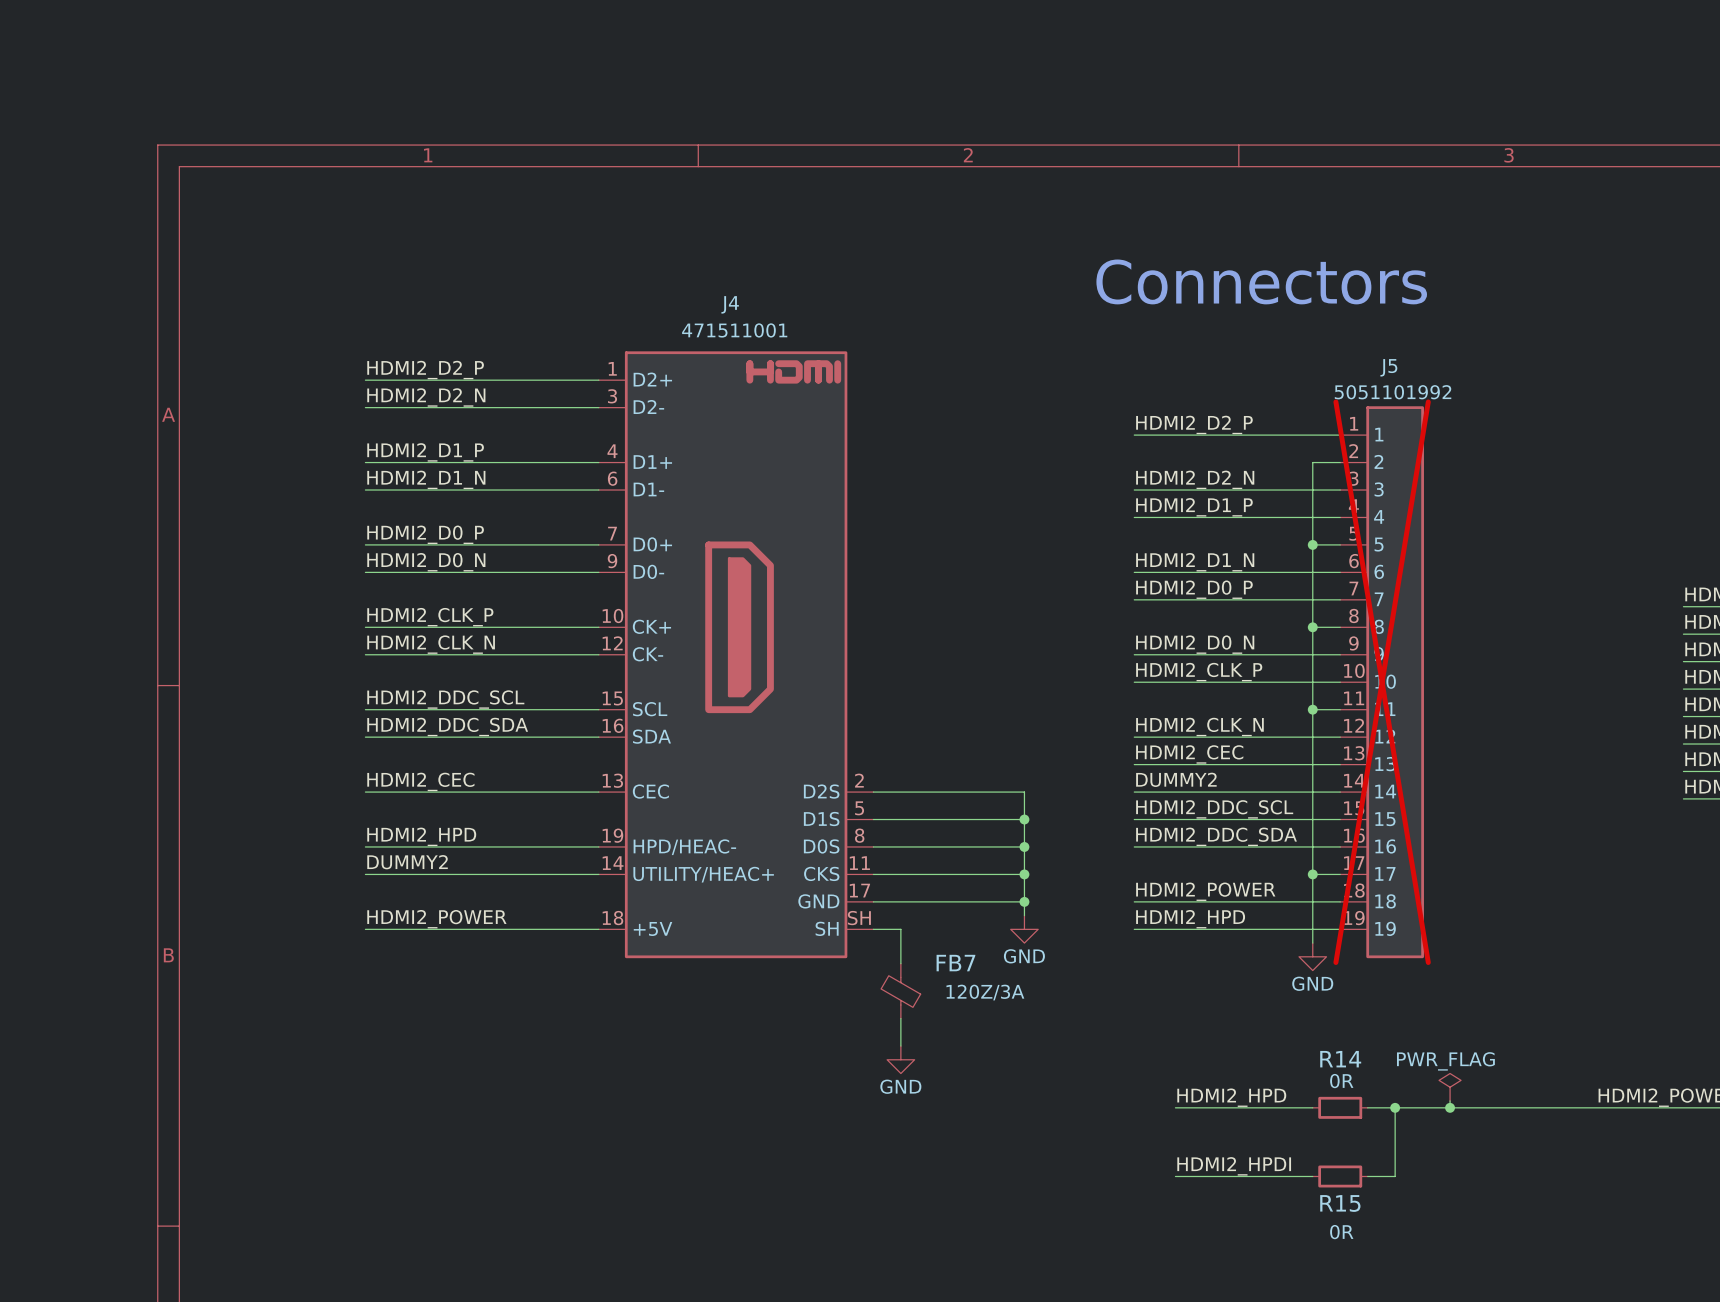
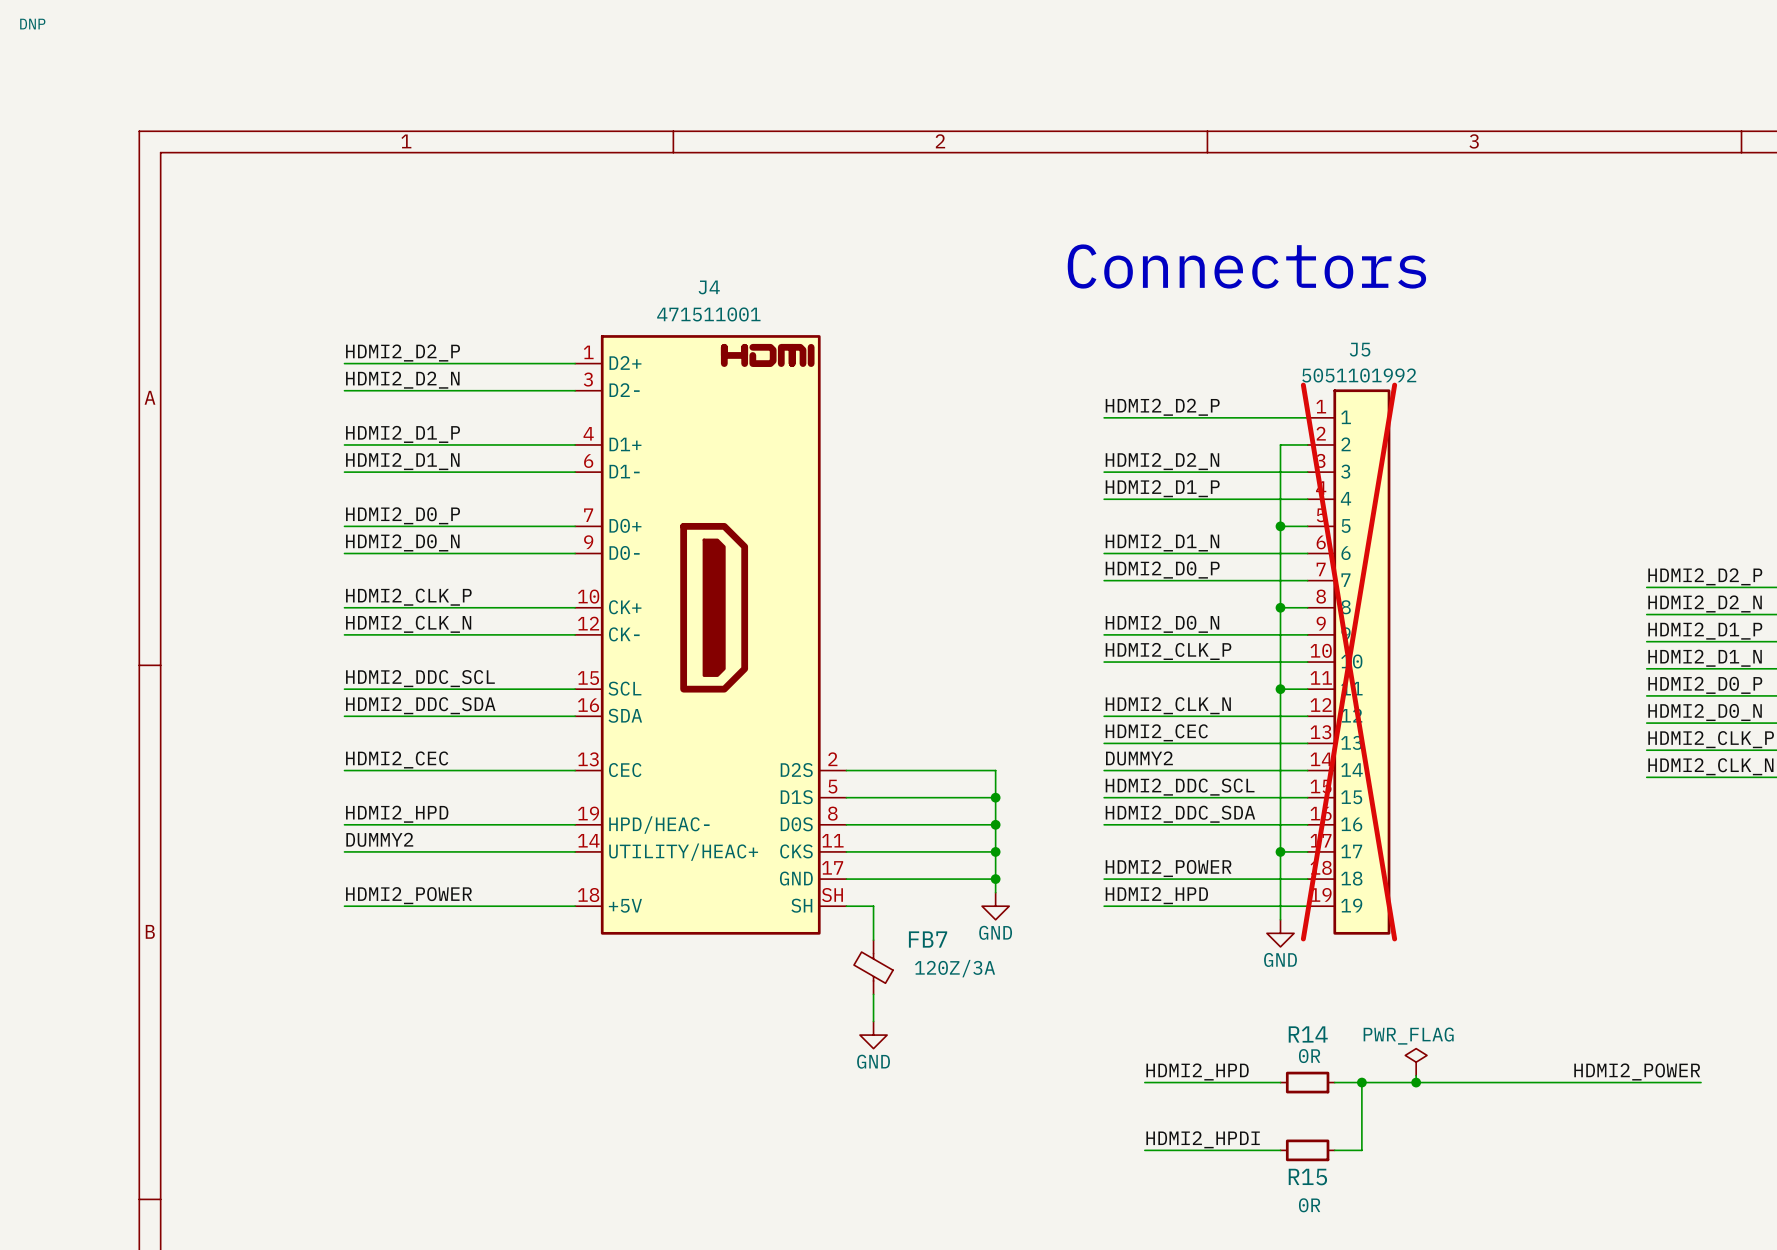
J5 text: none -> DNP (32, 24)

